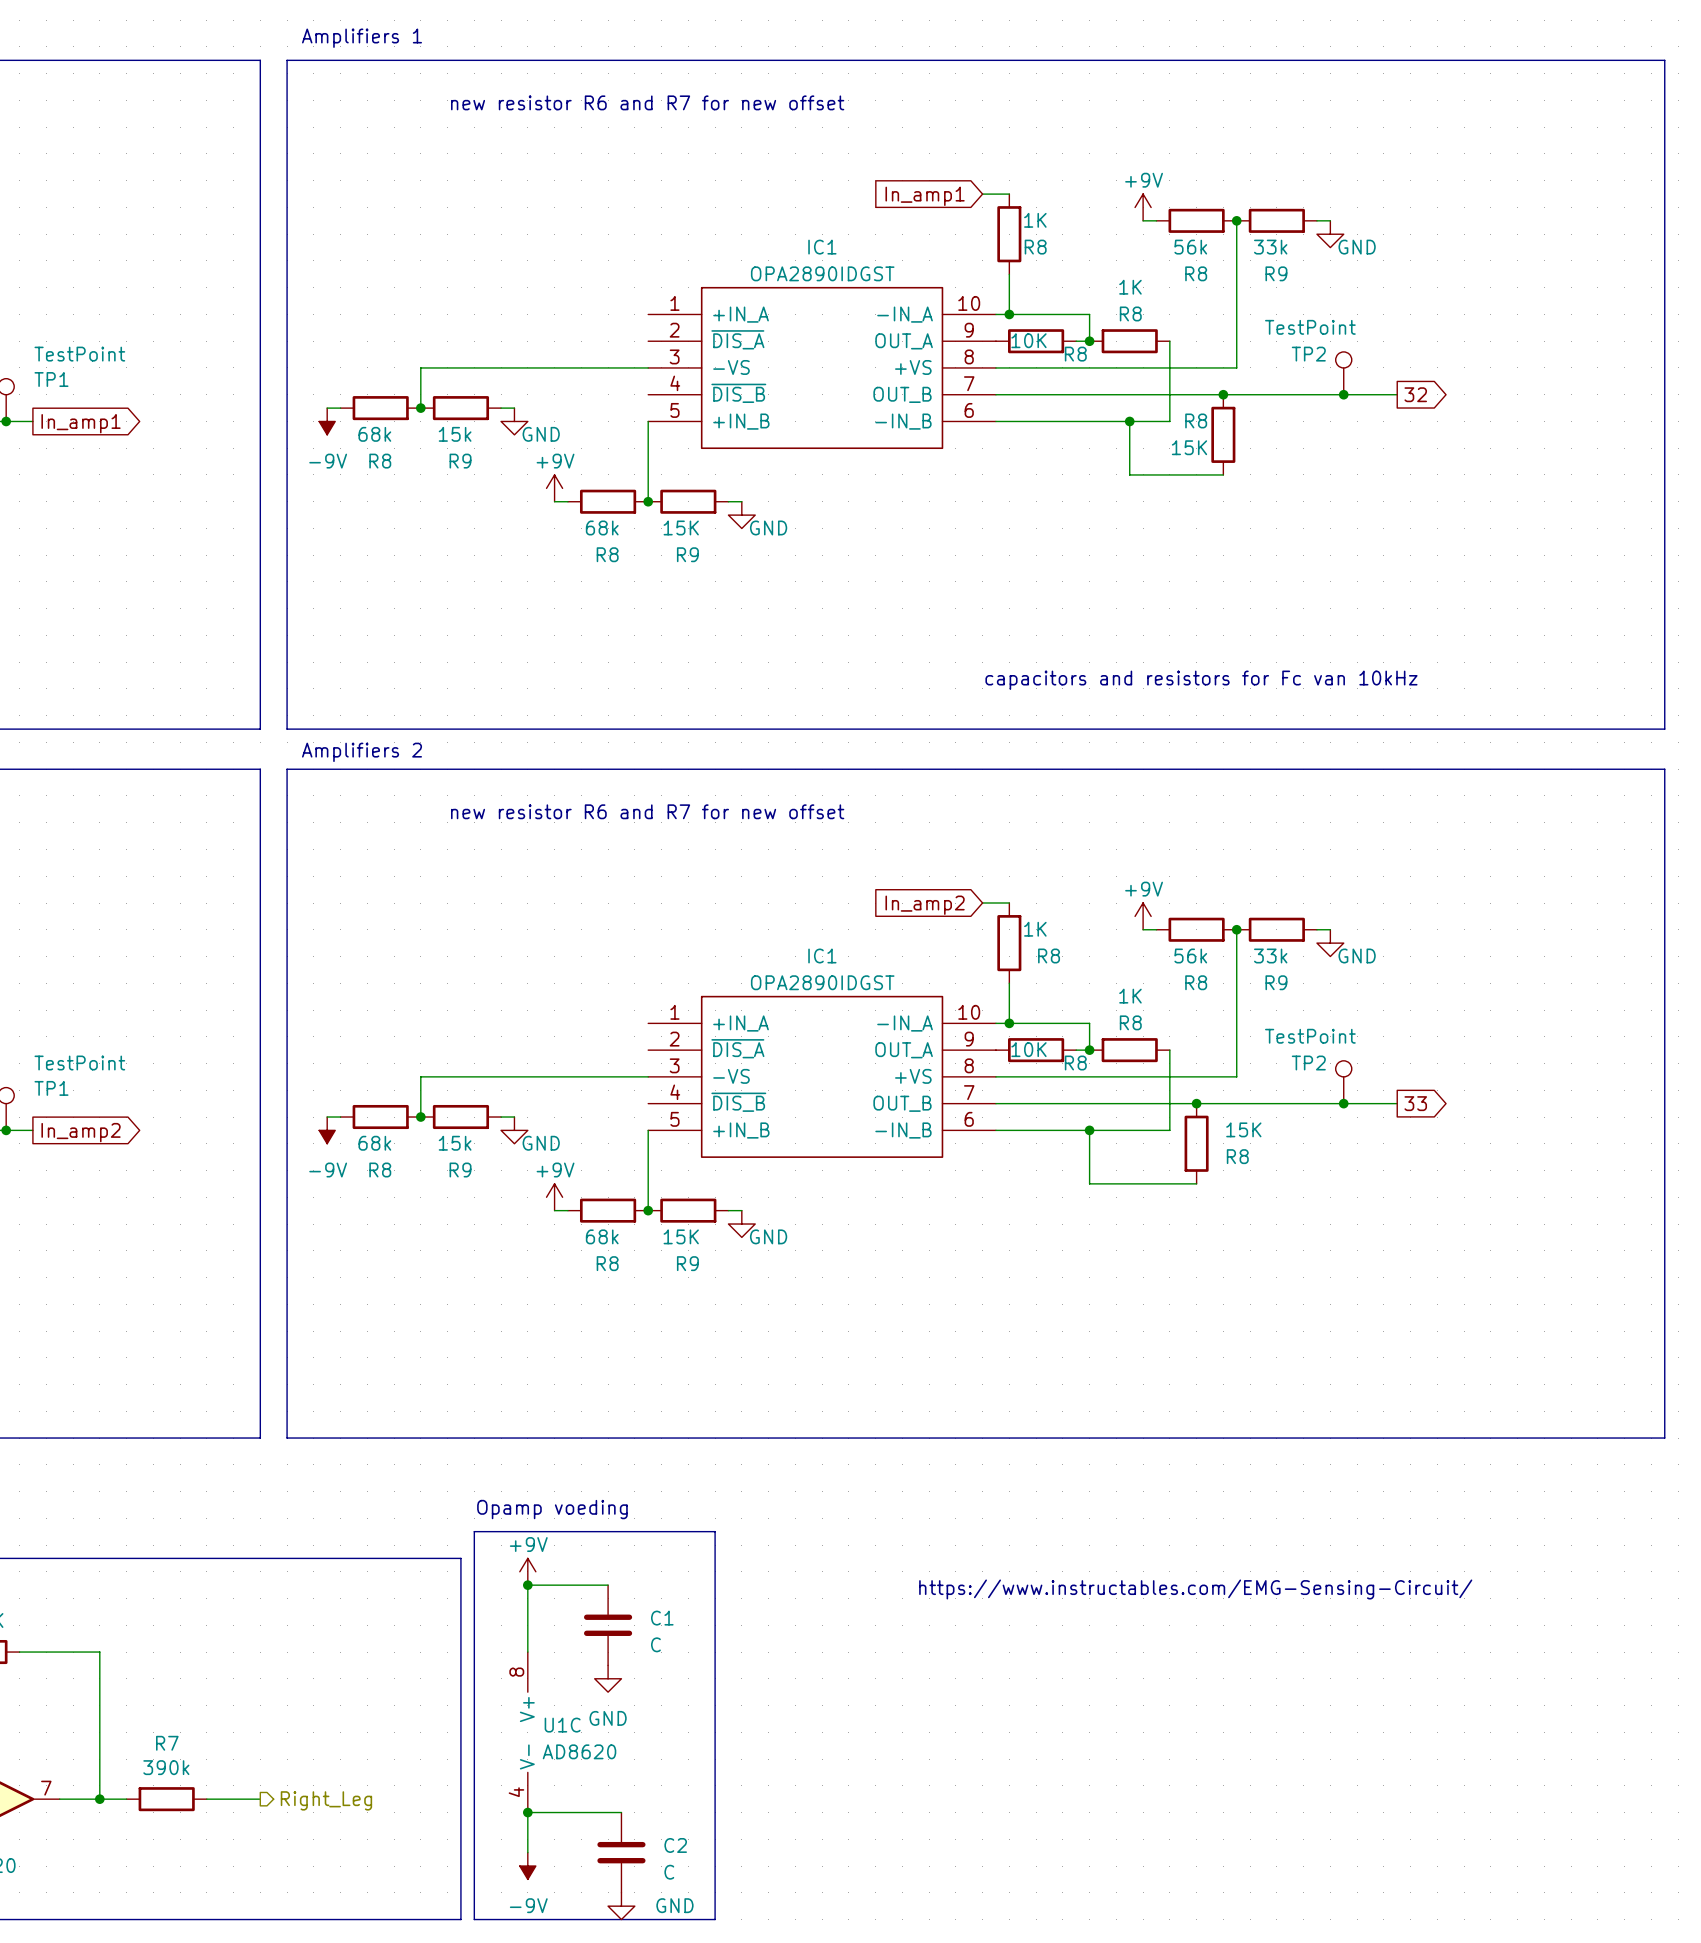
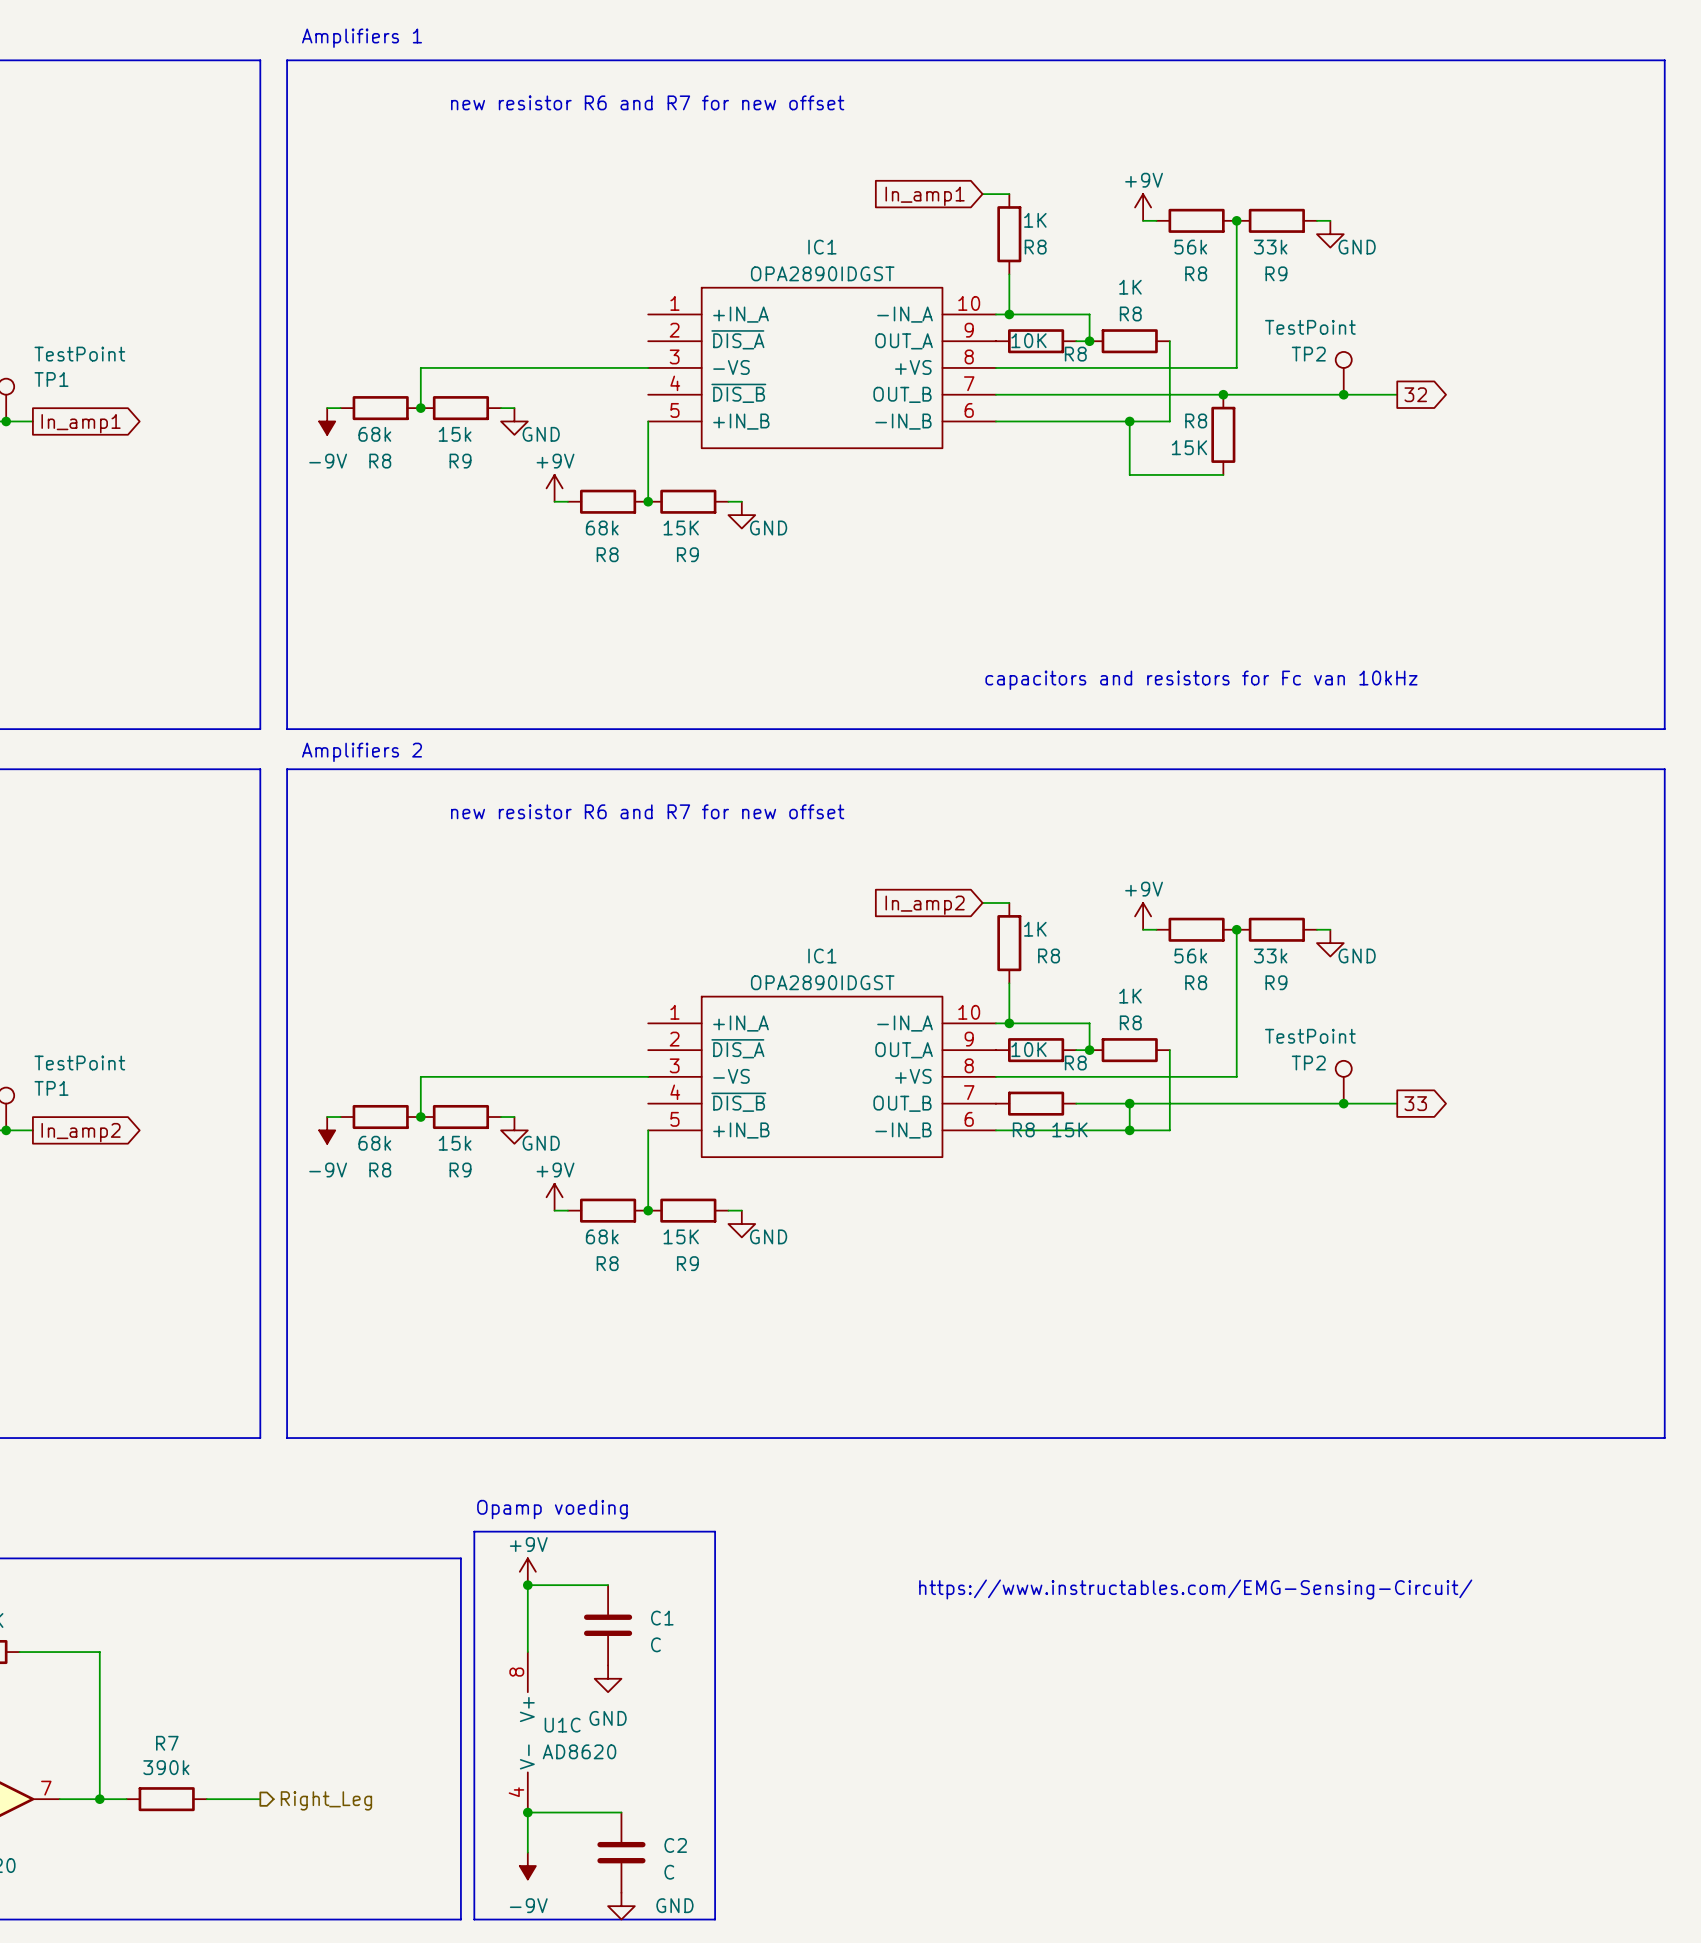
wire: (995, 1103) (1076, 1103) -> none
wire: none -> (1129, 1103) (1129, 1130)
junction: none -> (1129, 1103)
junction: (1196, 1103) -> none
R8 value position: 15K (1243, 1129) -> 15K (1069, 1129)
wire: (1089, 1130) (1089, 1183) (1196, 1183) -> none
junction: (1089, 1130) -> none
junction: none -> (1129, 1130)
R8 rotation: 0° (1196, 1143) -> 90° clockwise (1036, 1103)
R8 position: (1196, 1143) -> (1036, 1103)

